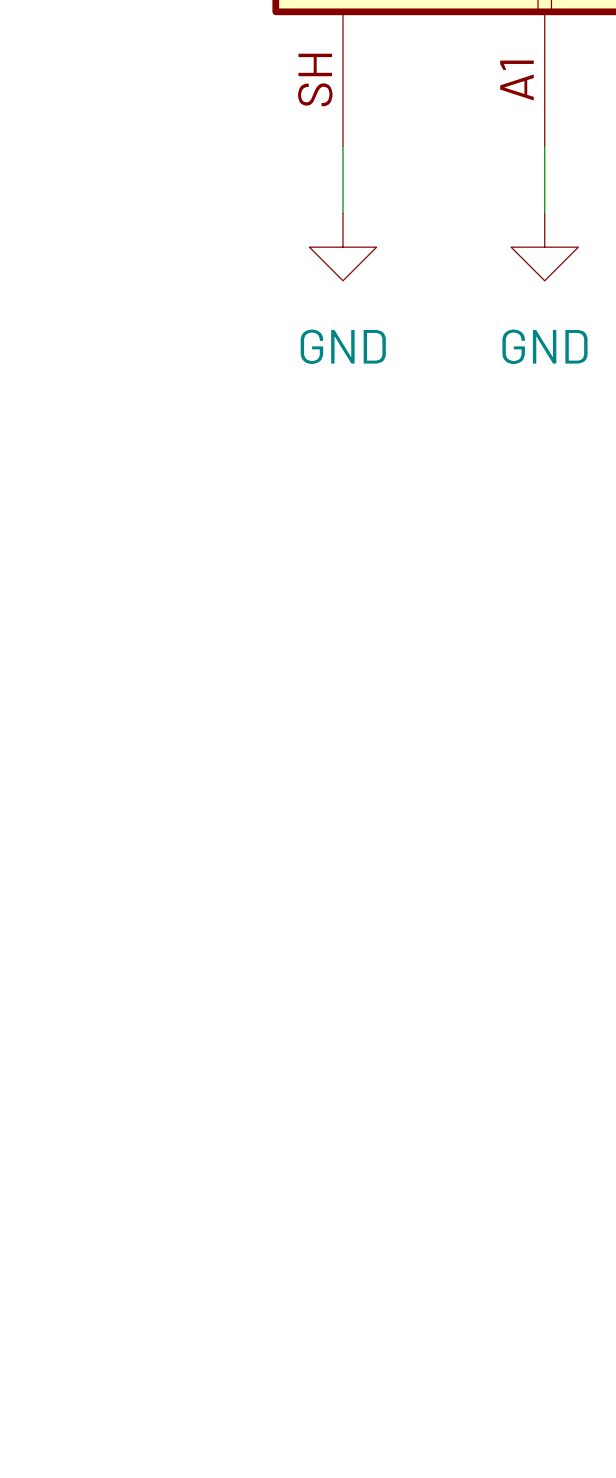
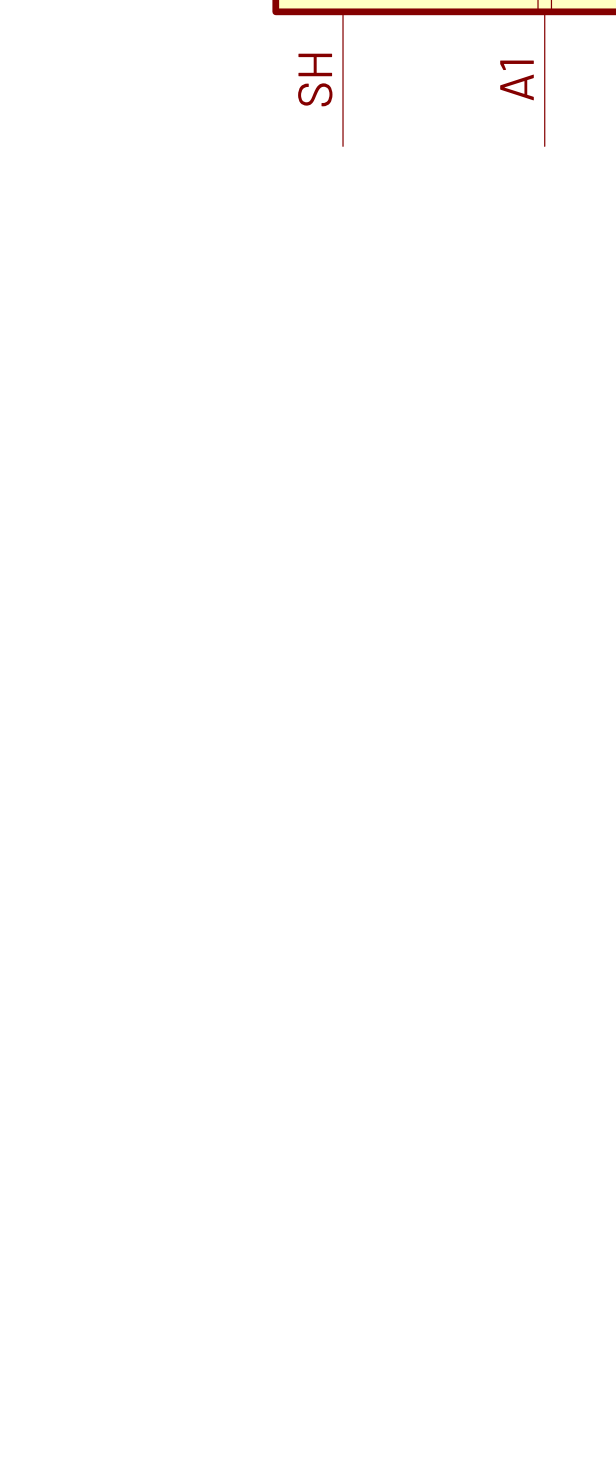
wire: (343, 146) (343, 213) -> none
wire: (544, 146) (544, 213) -> none
power symbol: GND (343, 247) -> none
power symbol: GND (544, 247) -> none

